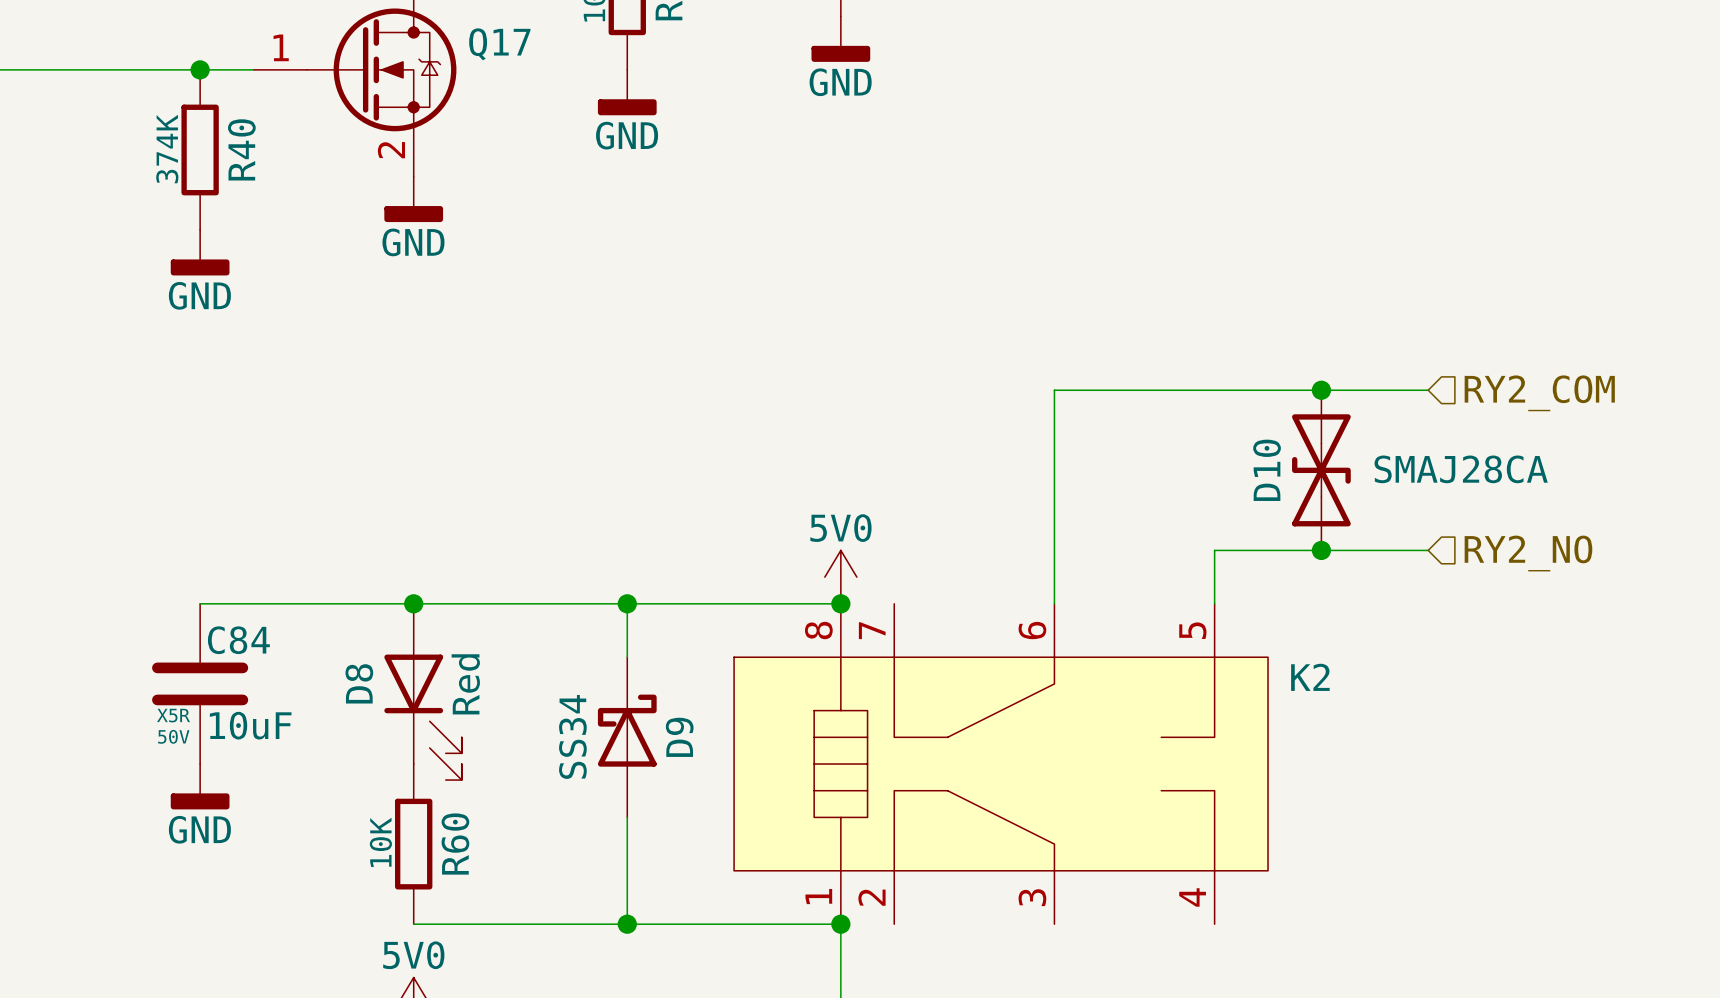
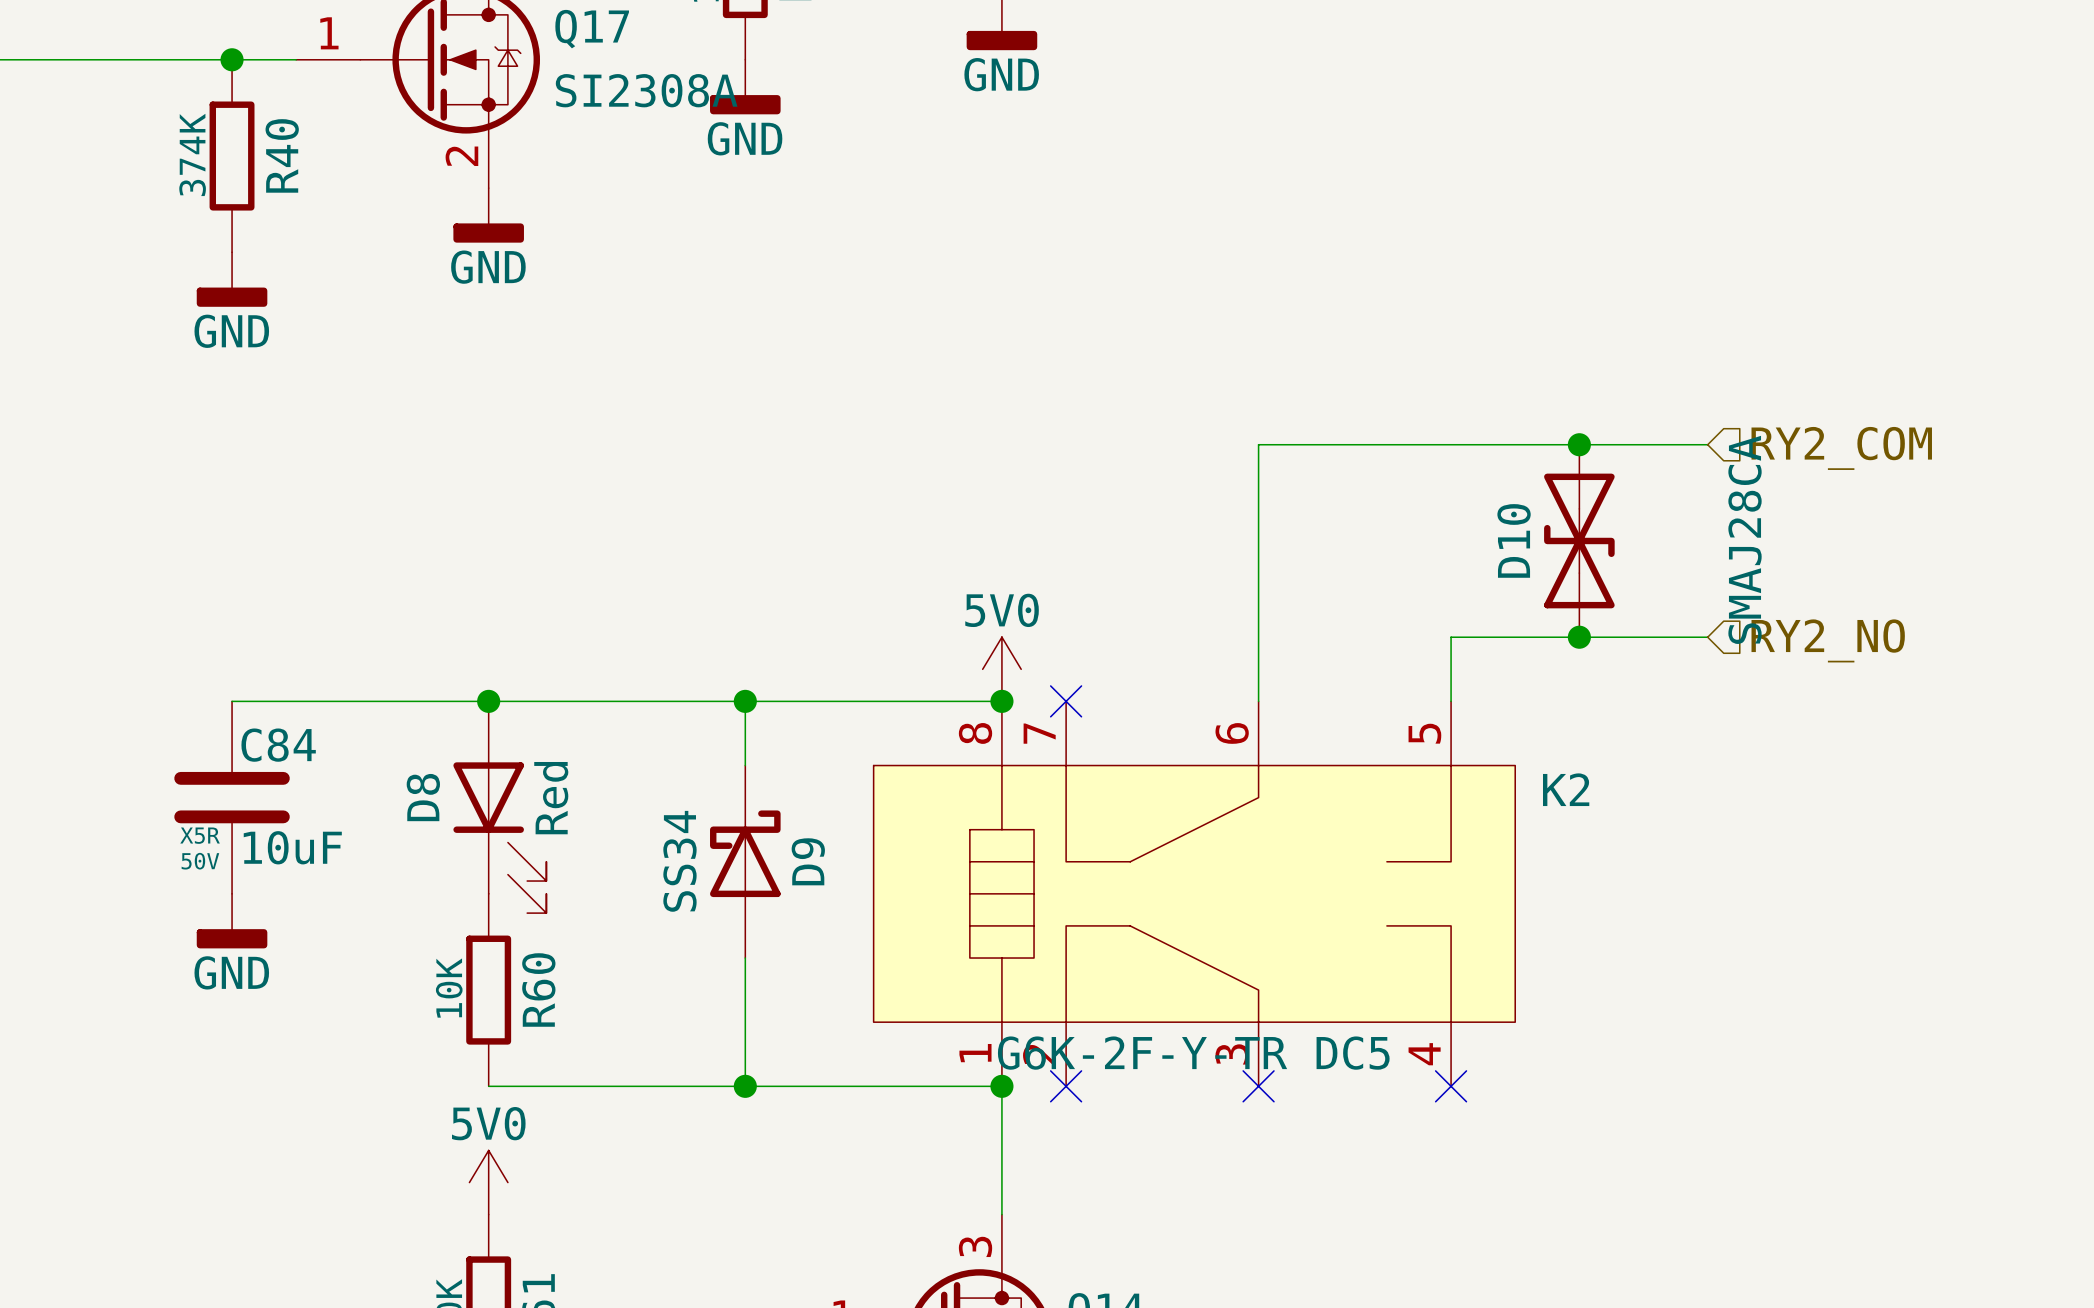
Q17 value: none -> SI2308A (646, 90)
D10 value rotation: 0° (1461, 469) -> 90° counterclockwise (1745, 539)
no-connect mark: none -> (1066, 701)
K2 value: none -> G6K-2F-Y-TR DC5 (1193, 1053)
no-connect mark: none -> (1066, 1086)
no-connect mark: none -> (1258, 1086)
no-connect mark: none -> (1451, 1086)

